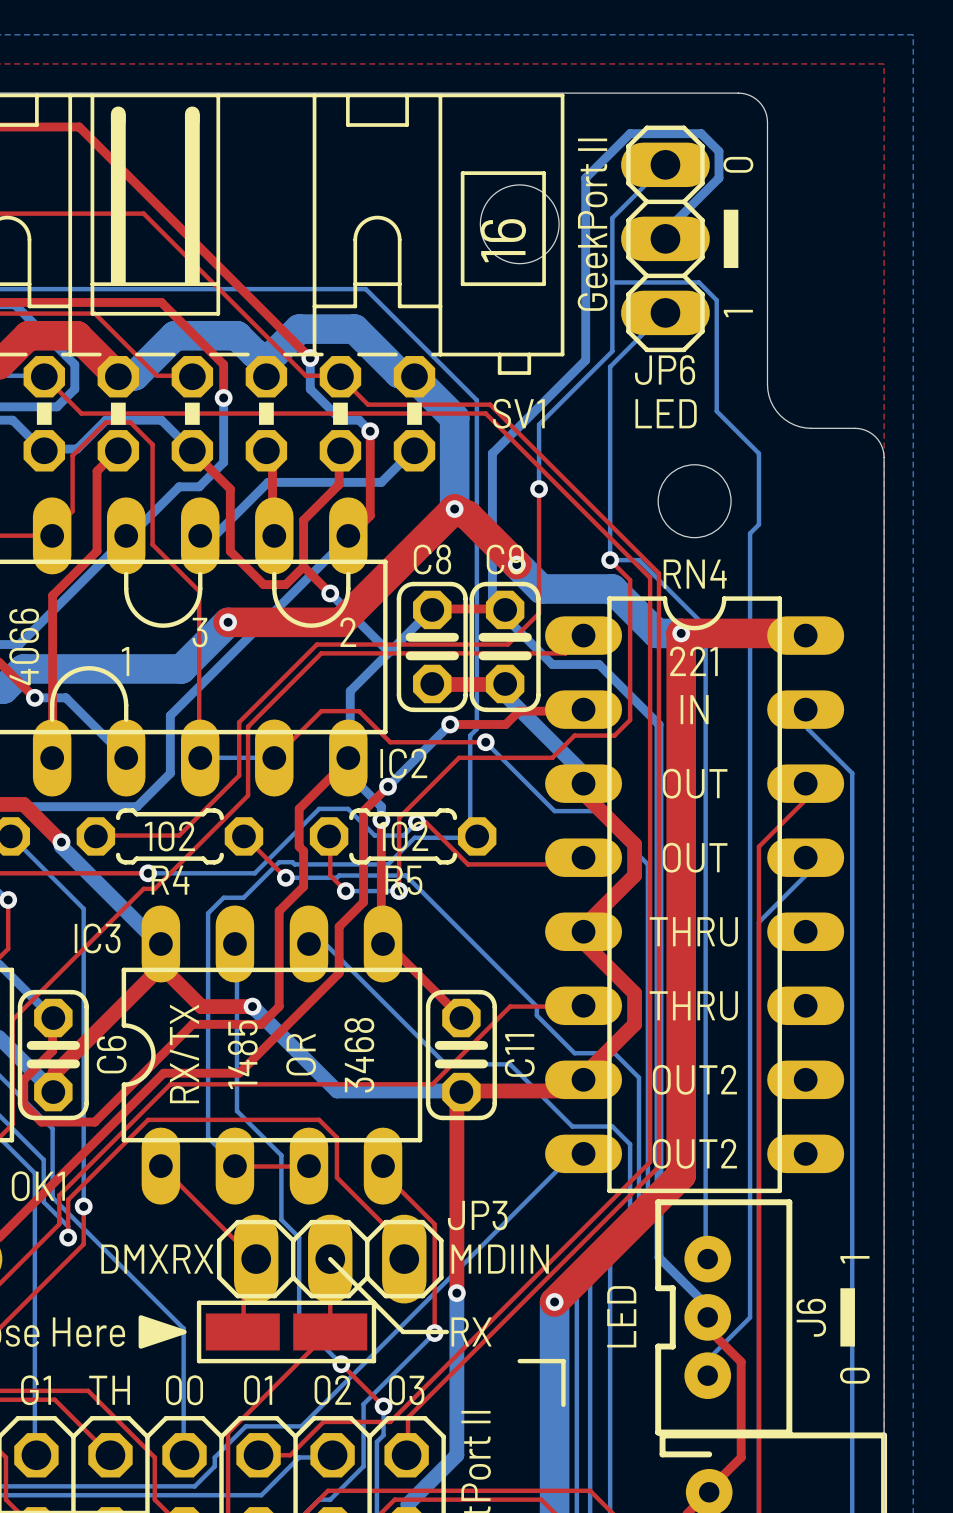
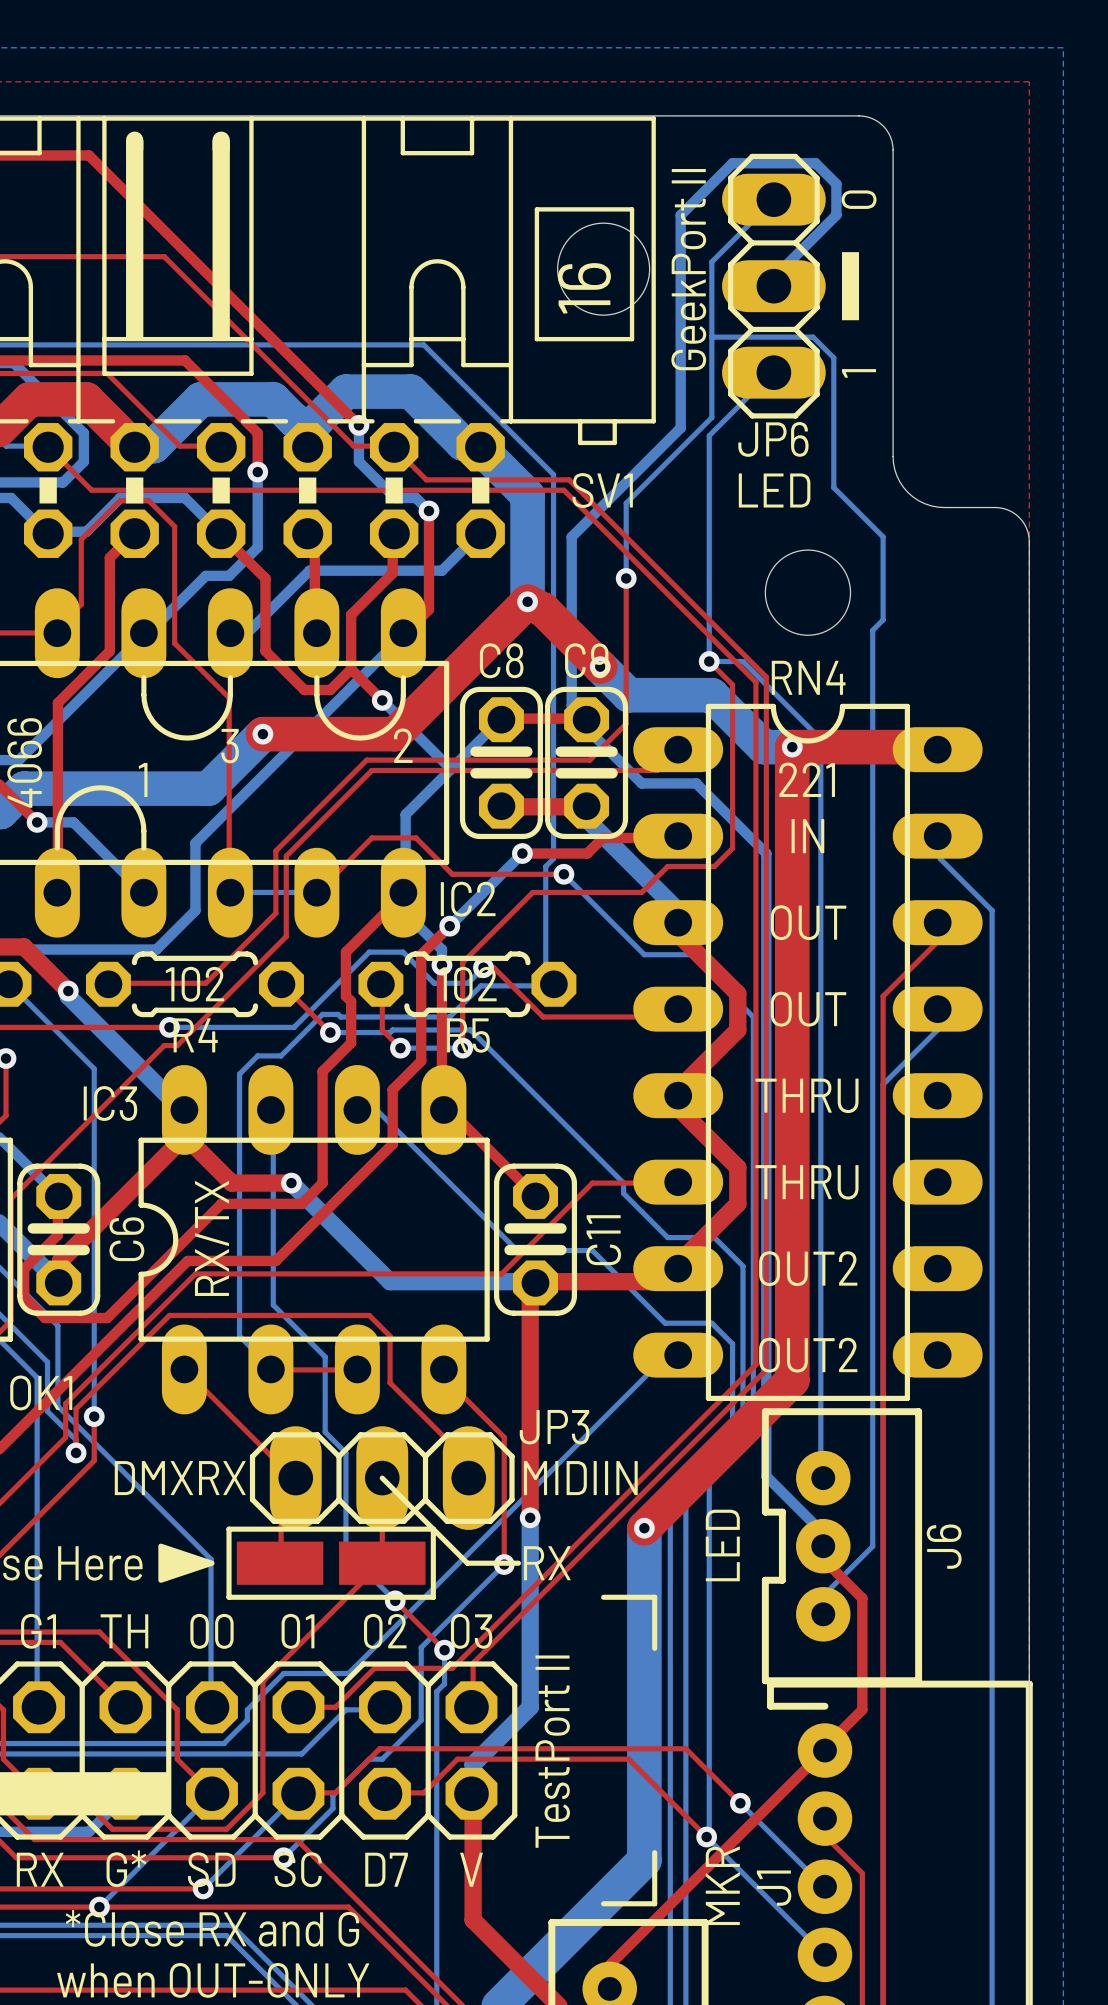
text: 1485 (242, 1054) -> none
text: OR (301, 1054) -> none
text: 3468 (359, 1055) -> none
text: 1 (854, 1259) -> none
drawing: [840, 1288, 855, 1347] -> none
text: 0 (854, 1375) -> none

